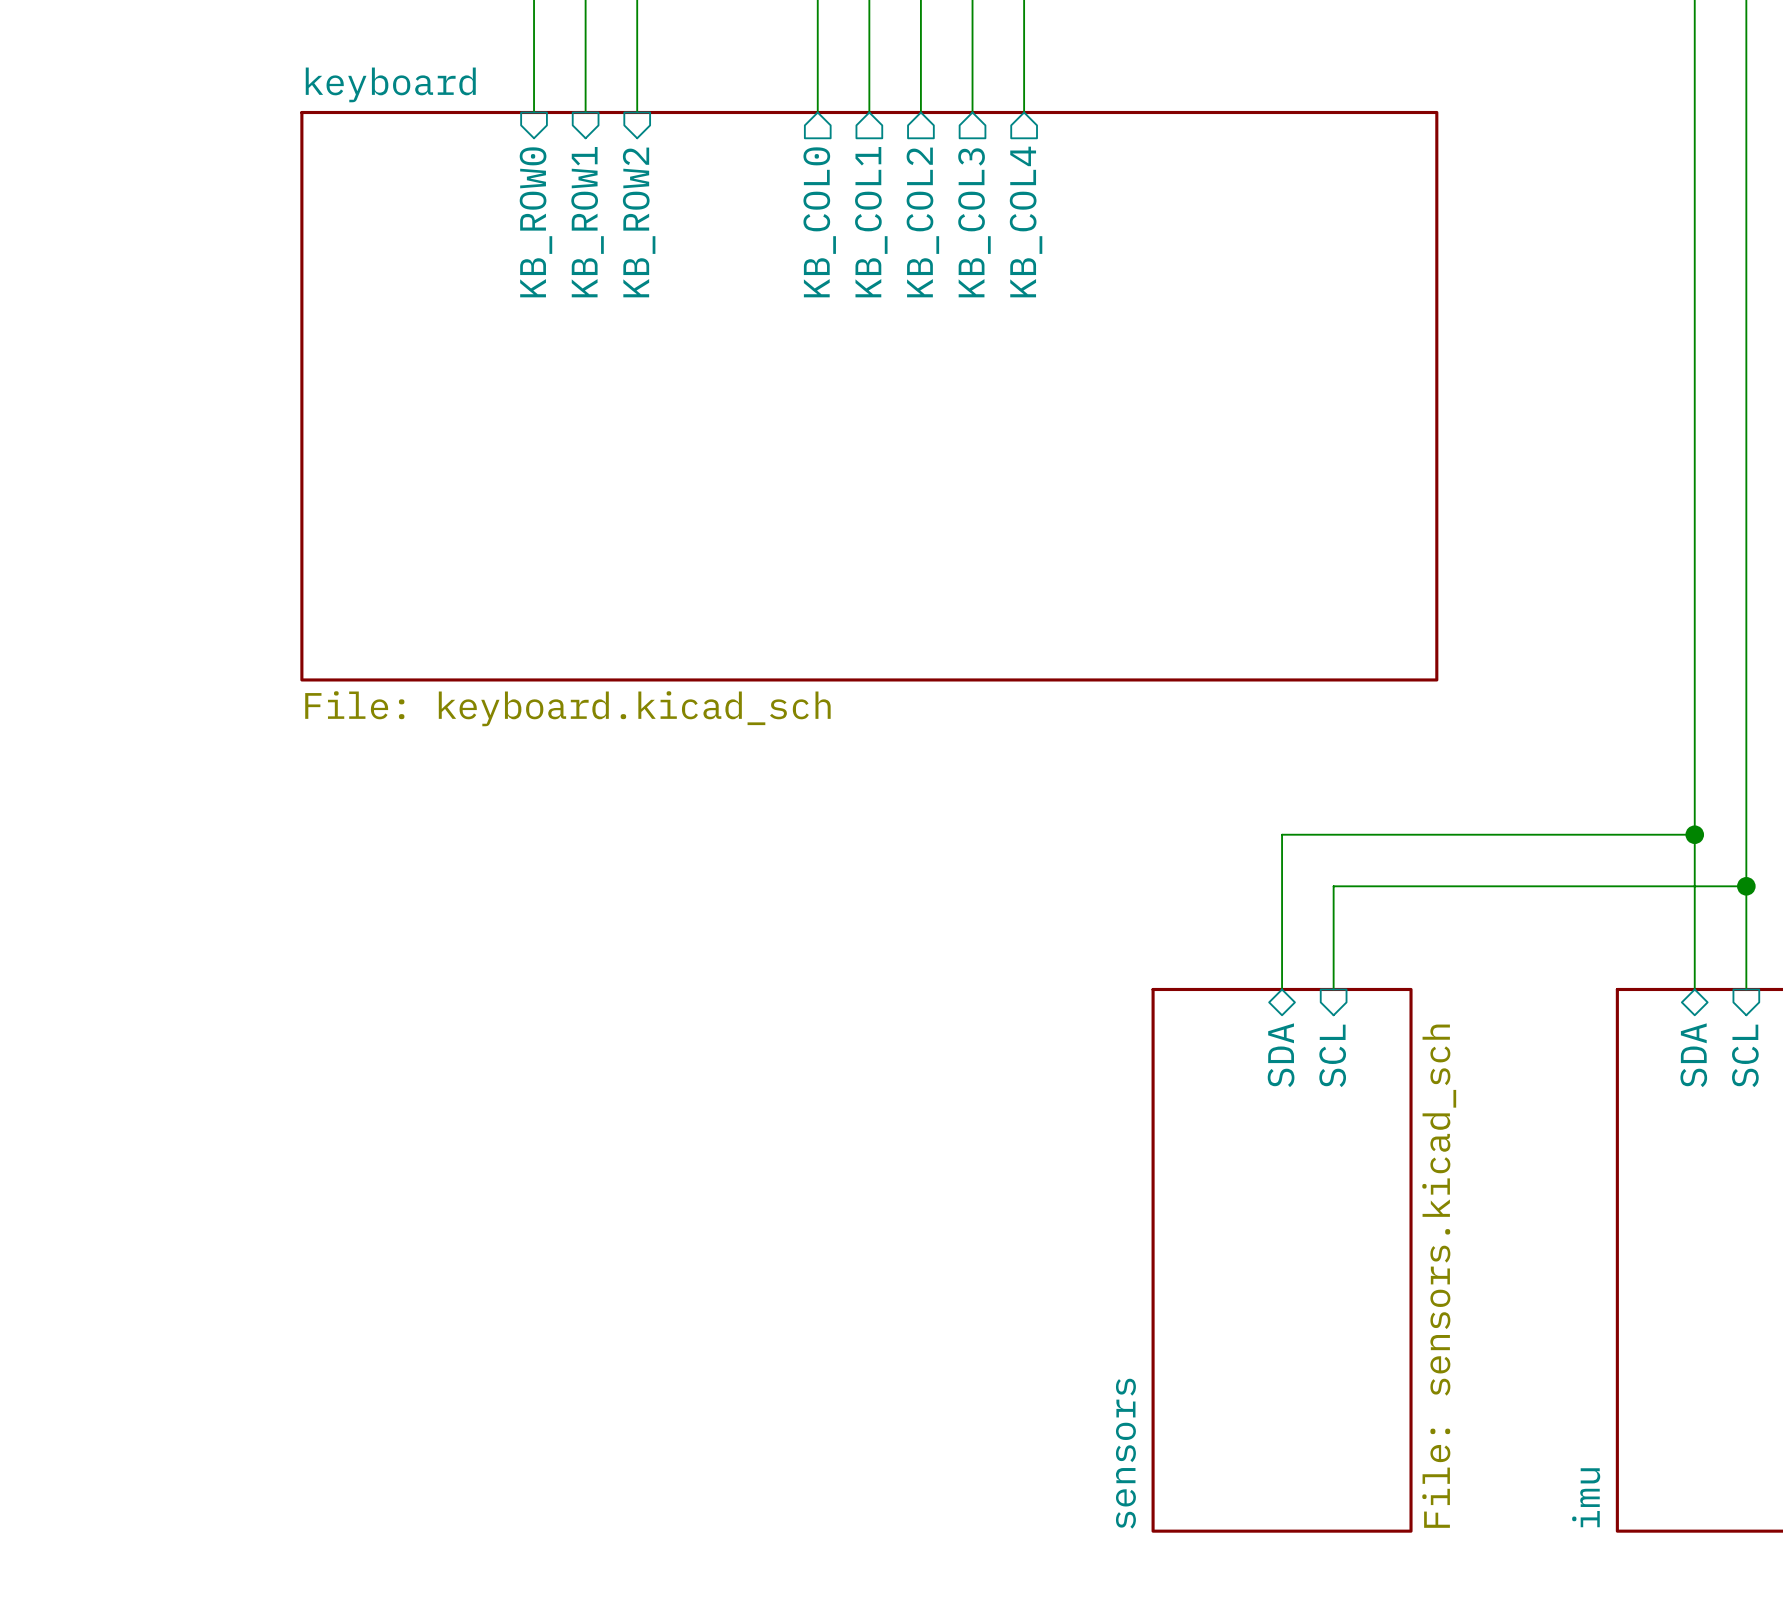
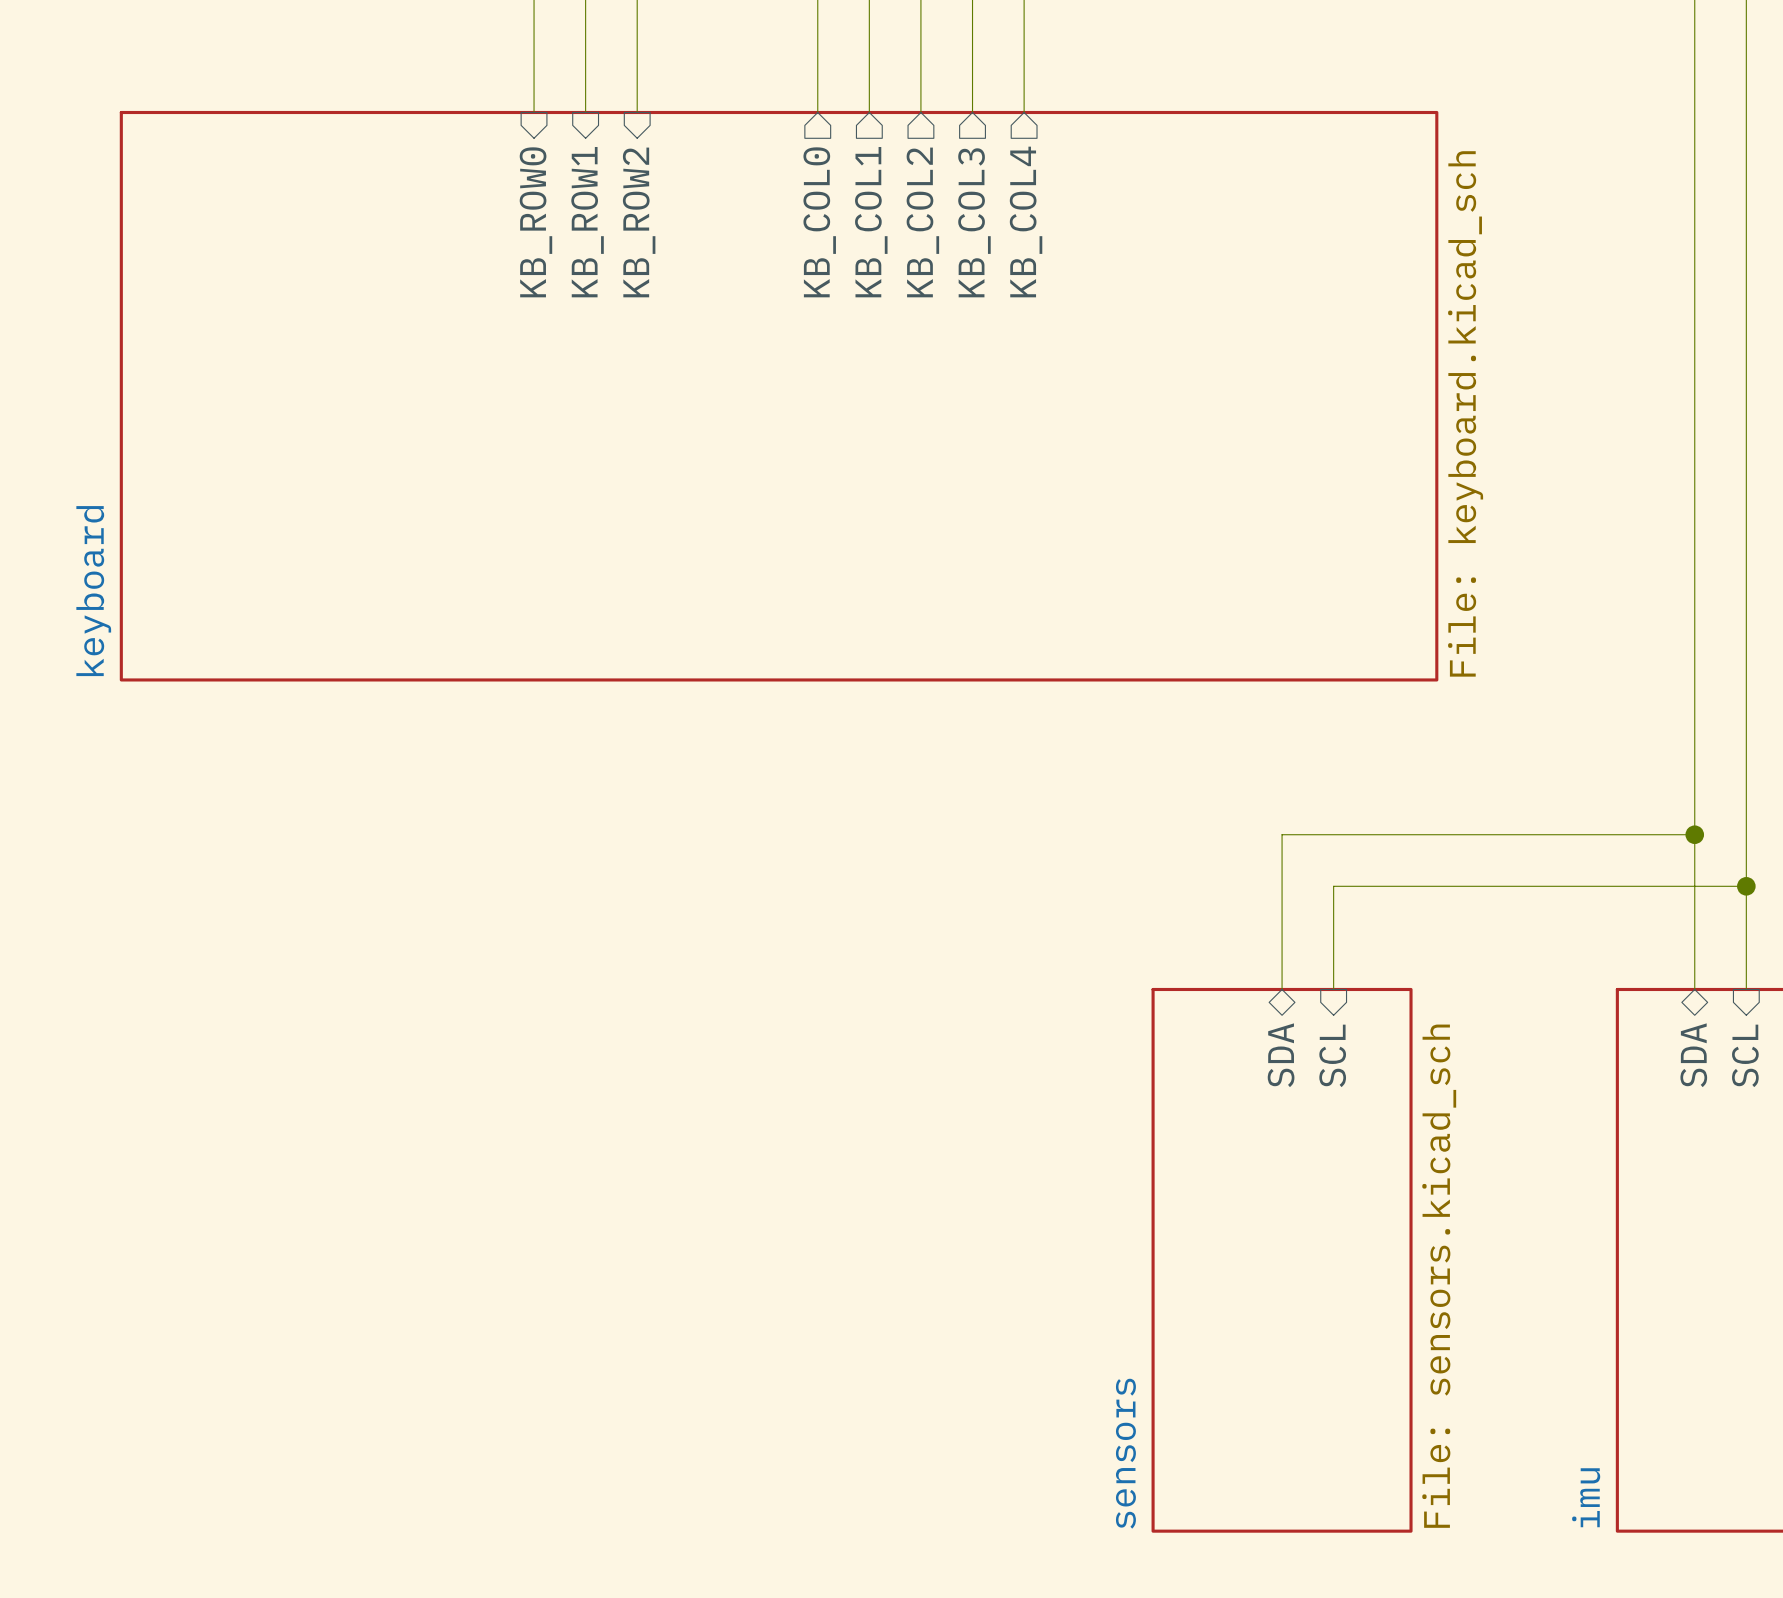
sheet keyboard: none -> File: keyboard.kicad_sch (779, 396)
sheet keyboard: File: keyboard.kicad_sch (869, 396) -> none

